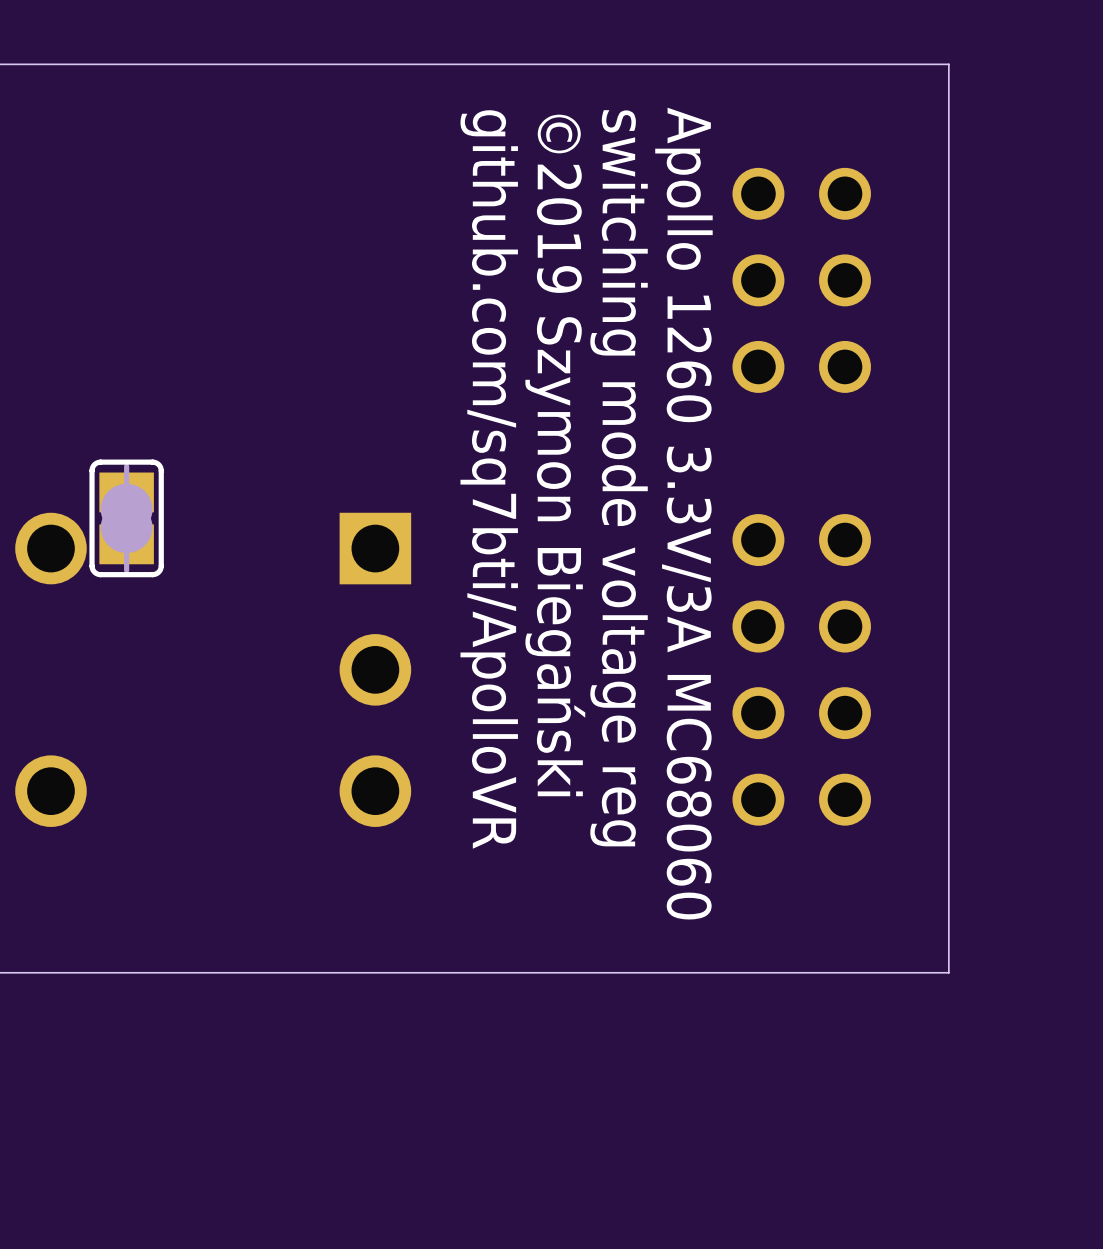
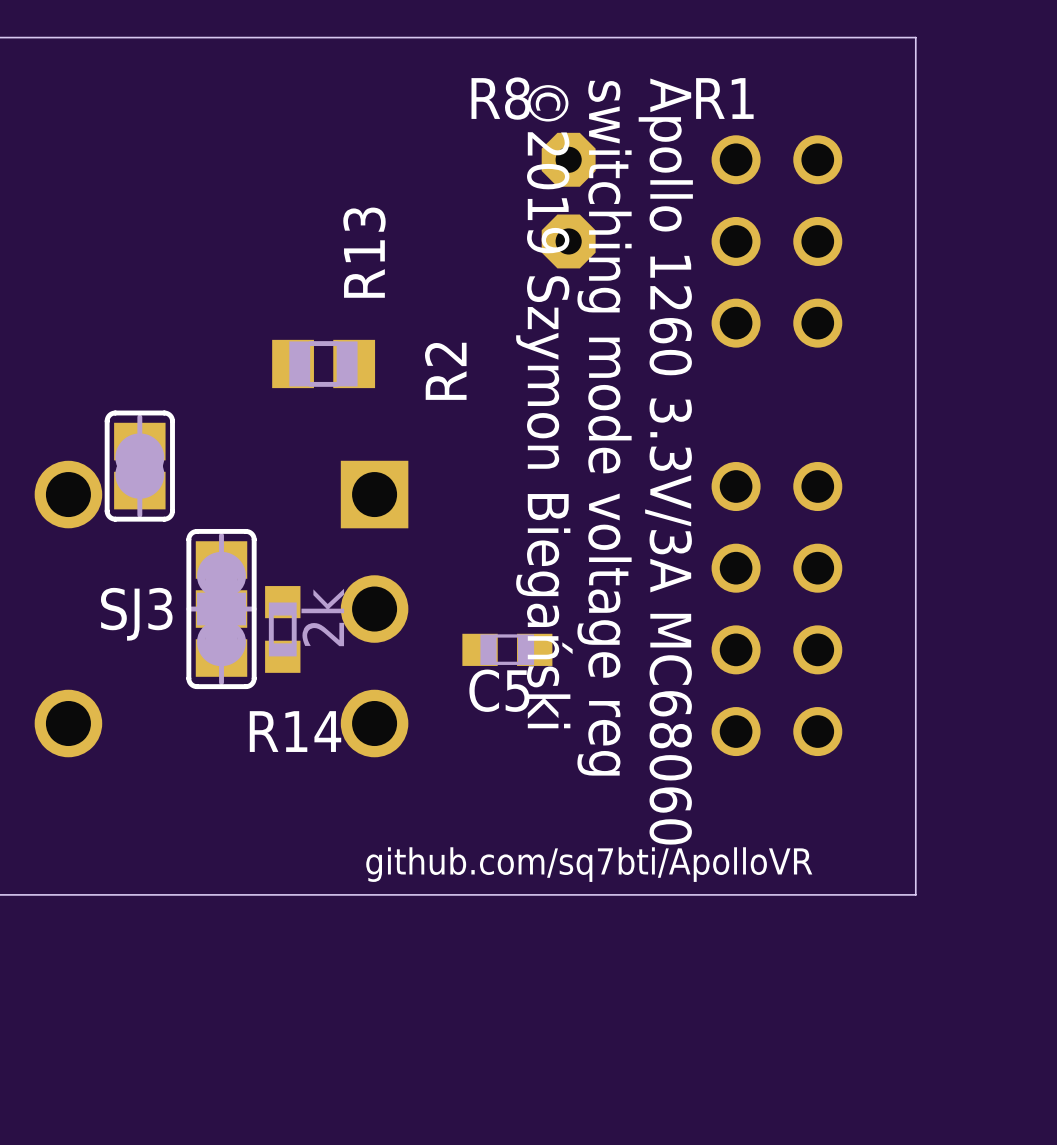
R8: none -> (500, 98)
R1: none -> (724, 98)
part: none -> (568, 200)
R13: none -> (364, 252)
part: none -> (323, 363)
R2: none -> (445, 371)
text: github.com/sq7bti/ApolloVR (489, 479) -> none
SJ3: none -> (221, 609)
R14: none -> 2k (282, 629)
C5: none -> (507, 649)
text: none -> github.com/sq7bti/ApolloVR (589, 864)

